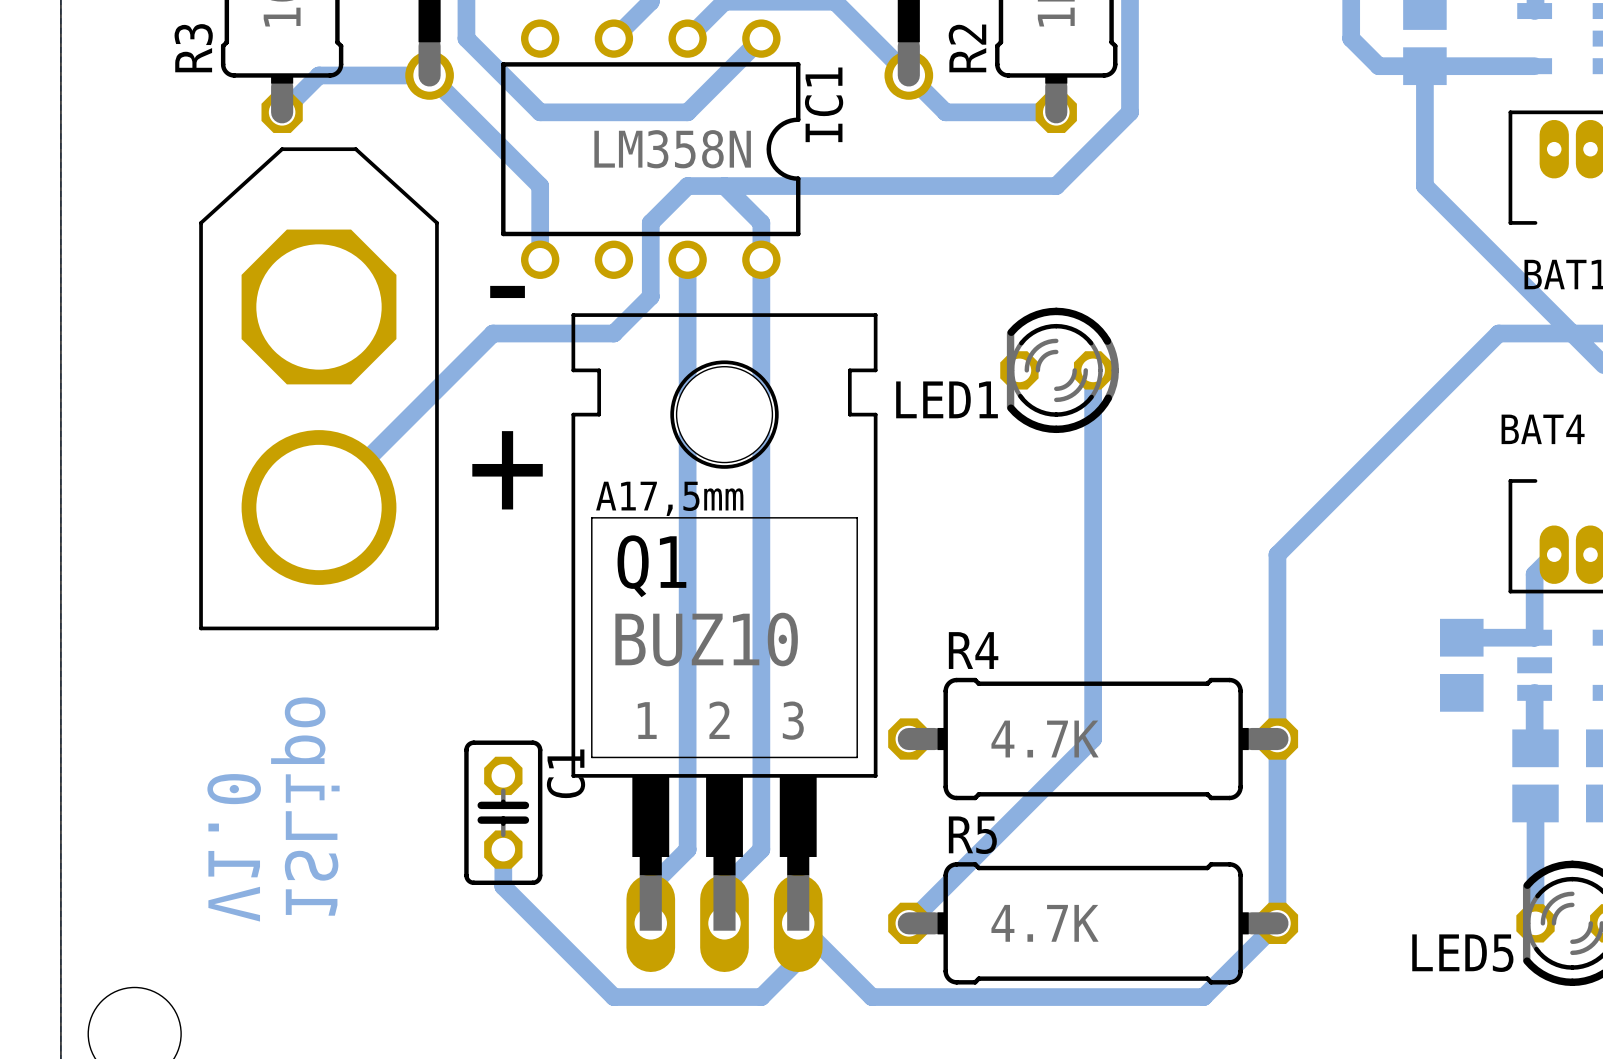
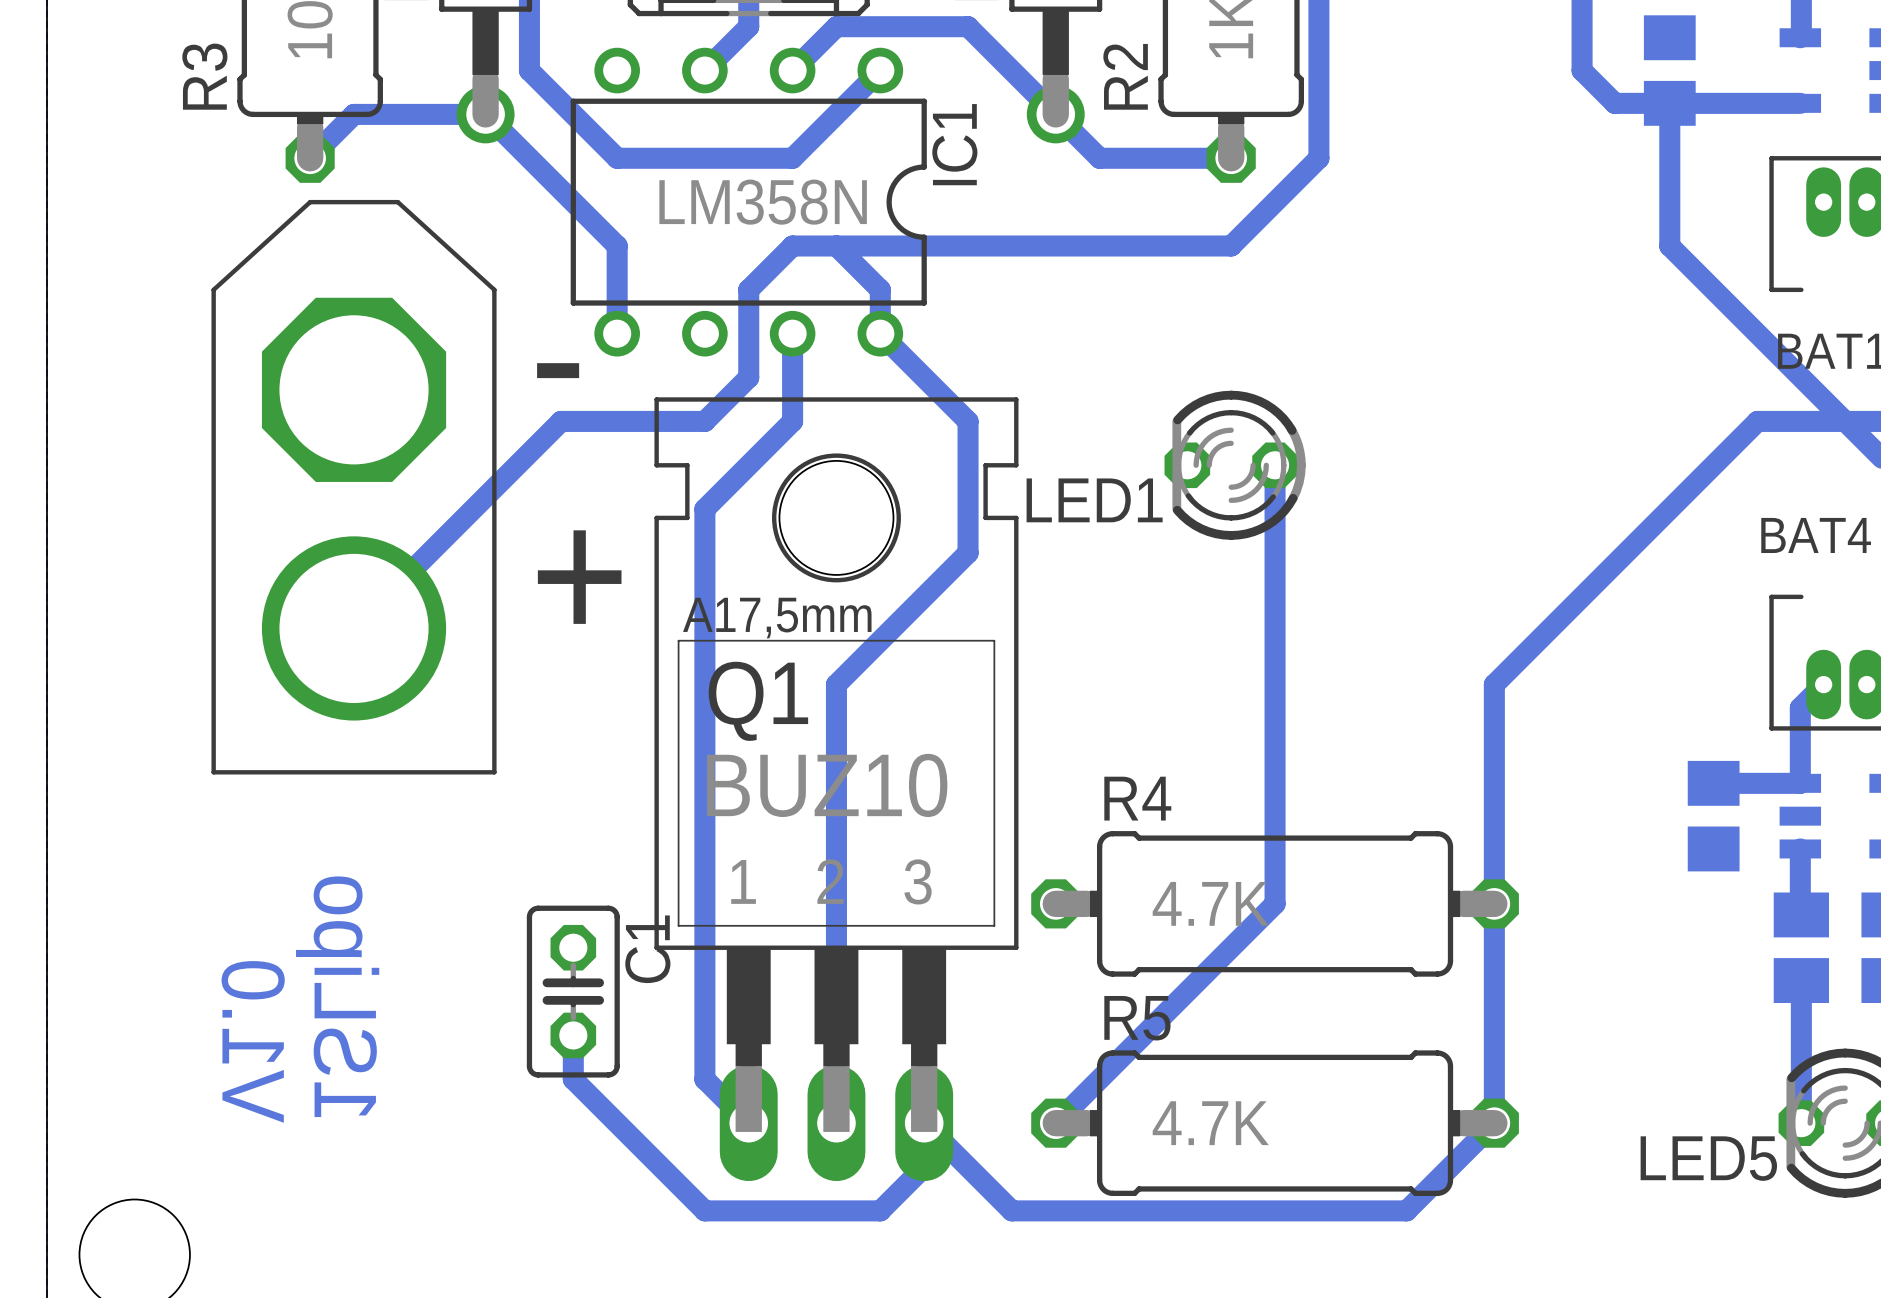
bottom track: (761, 259) (761, 849) (724, 886) -> (880, 333) (968, 421) (968, 553) (836, 684) (836, 1079)
bottom track: (687, 333) (687, 849) (650, 886) (650, 923) -> (792, 421) (704, 509) (704, 1079) (748, 1123)

